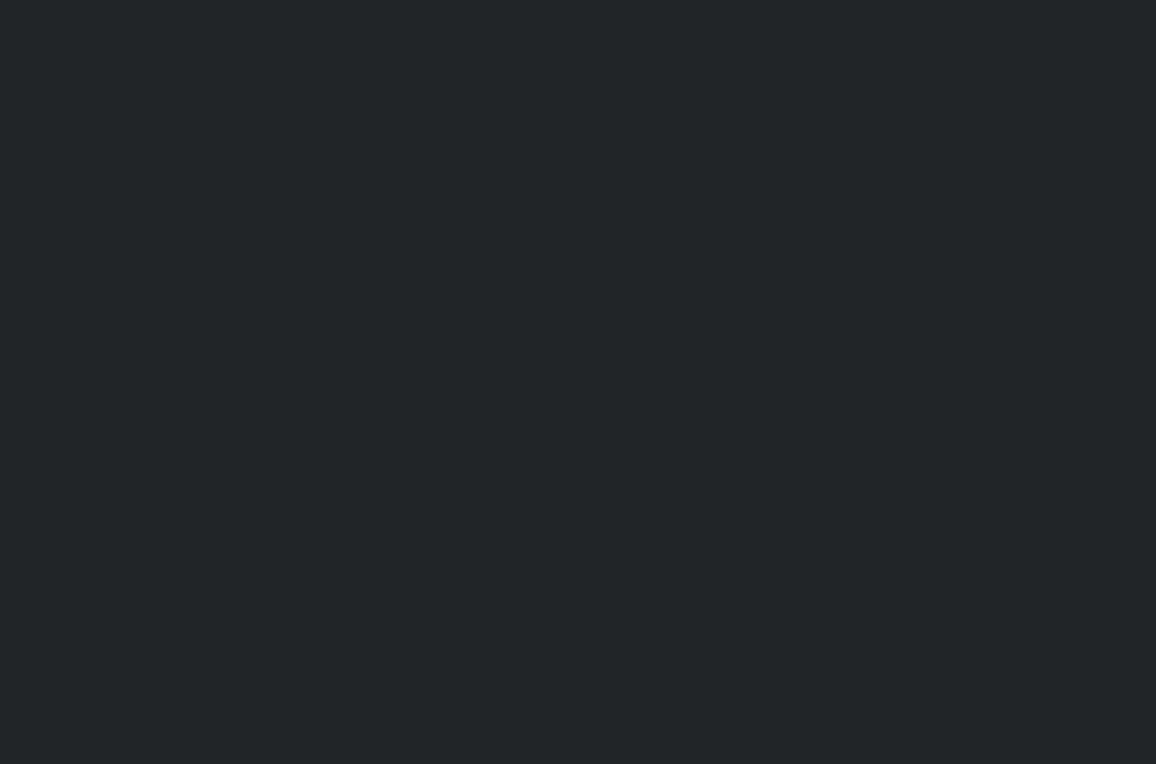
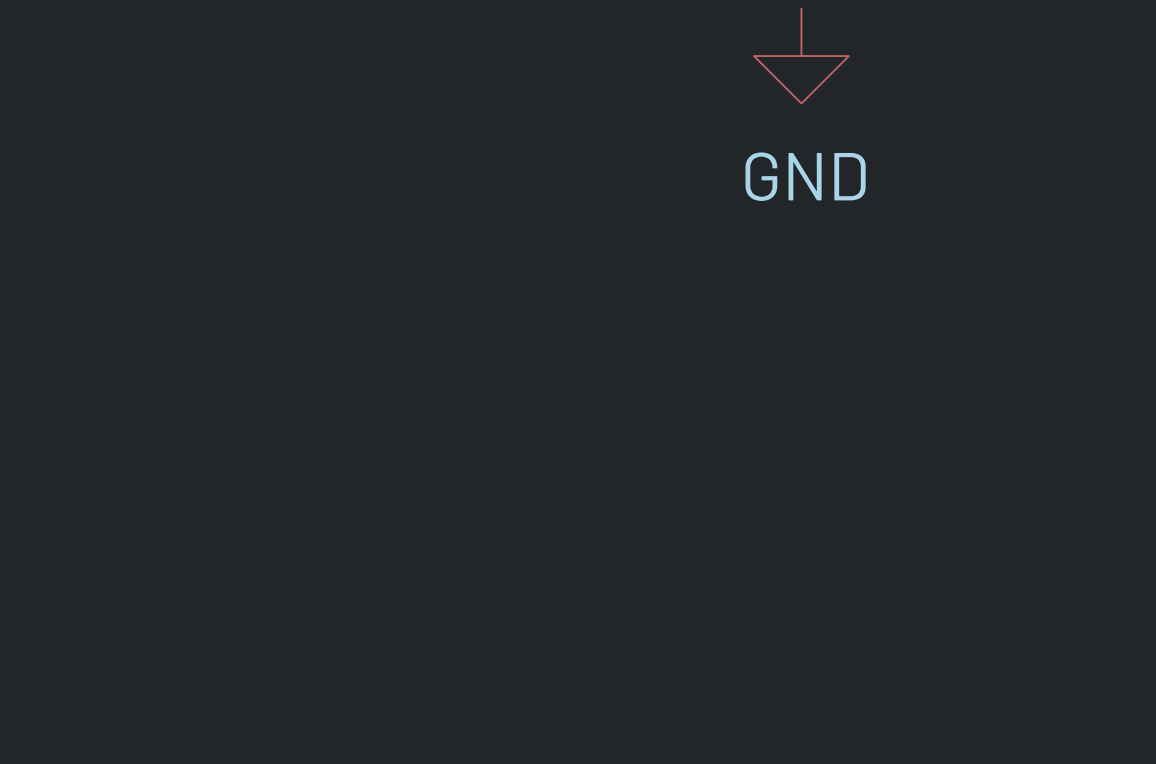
power symbol: none -> GND (801, 56)

